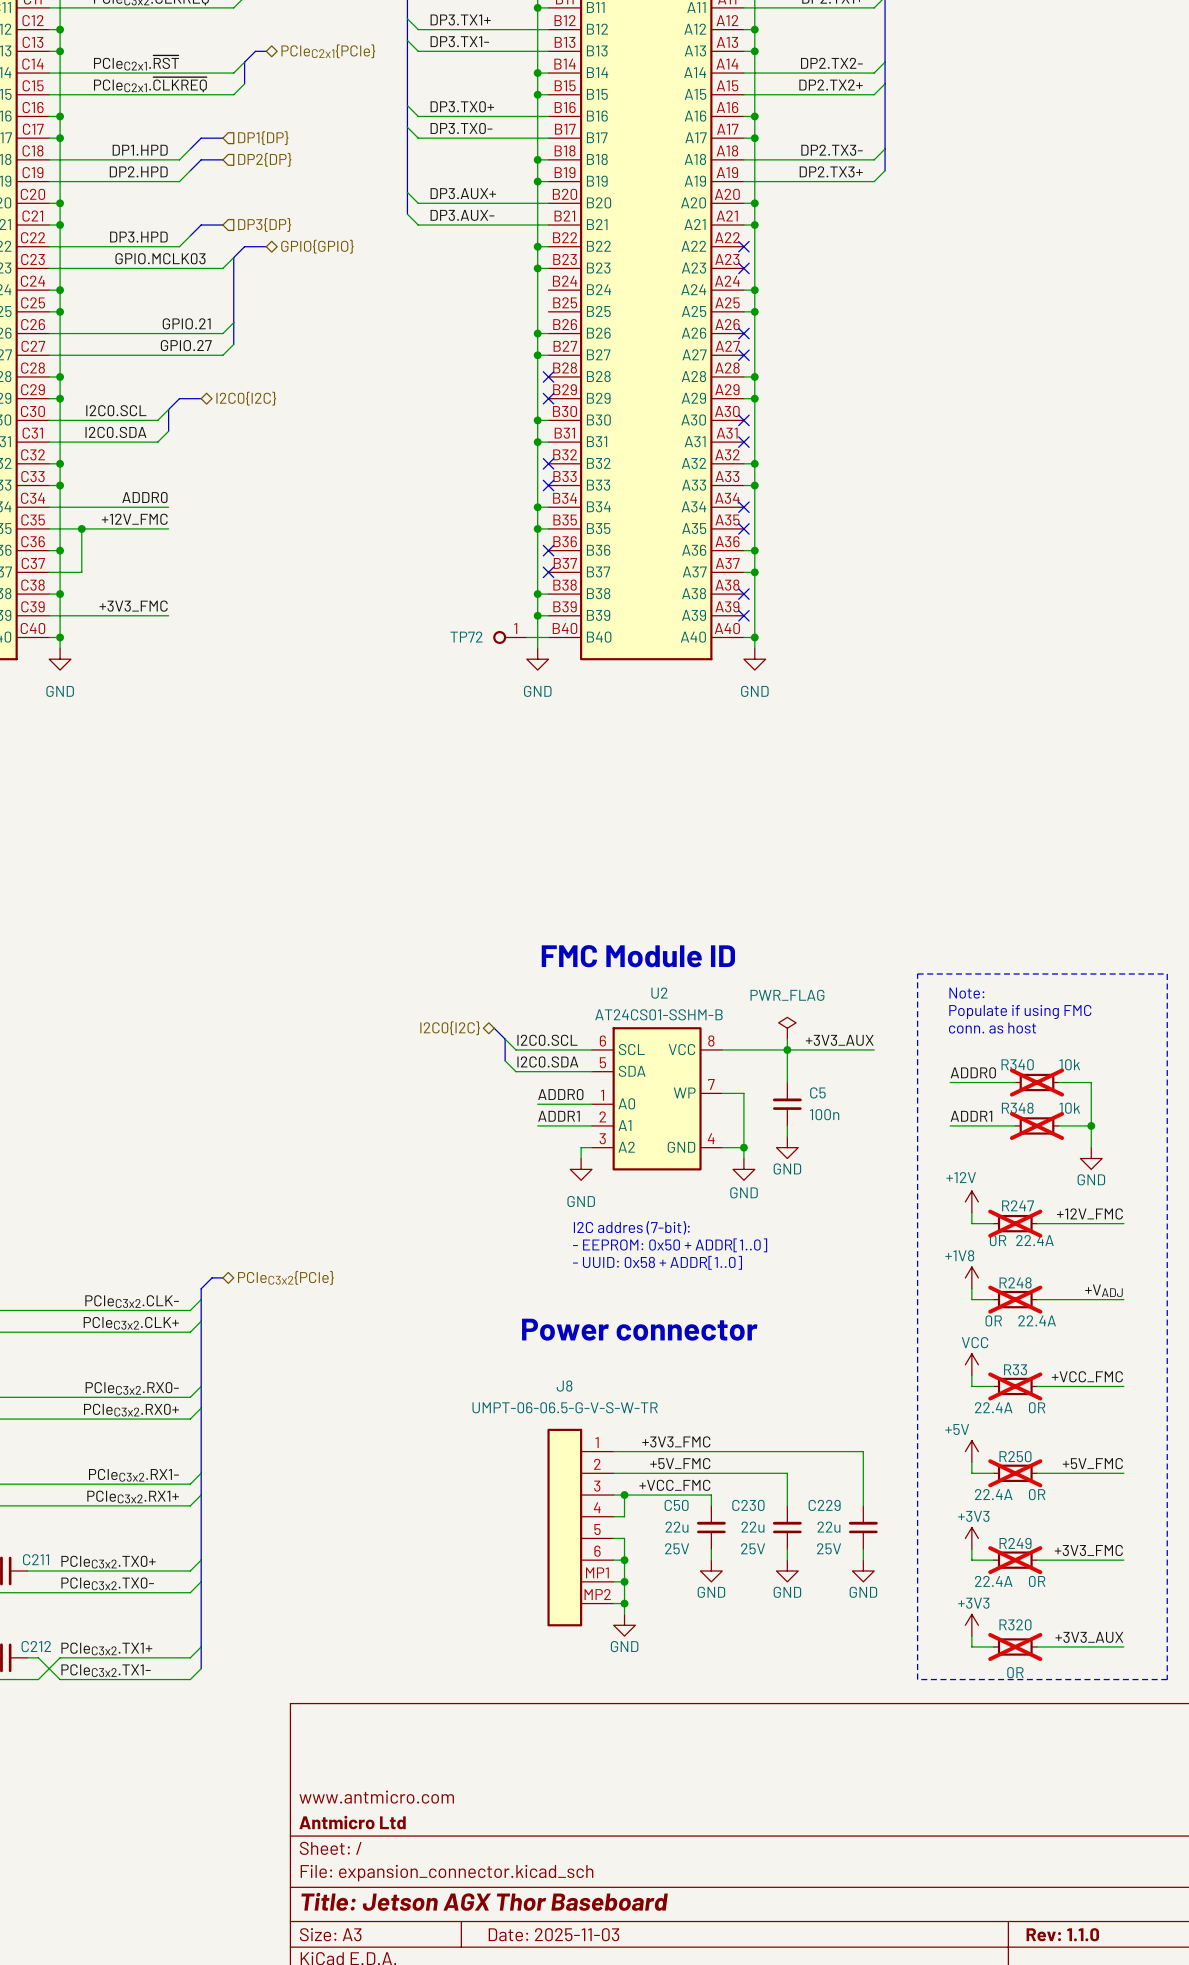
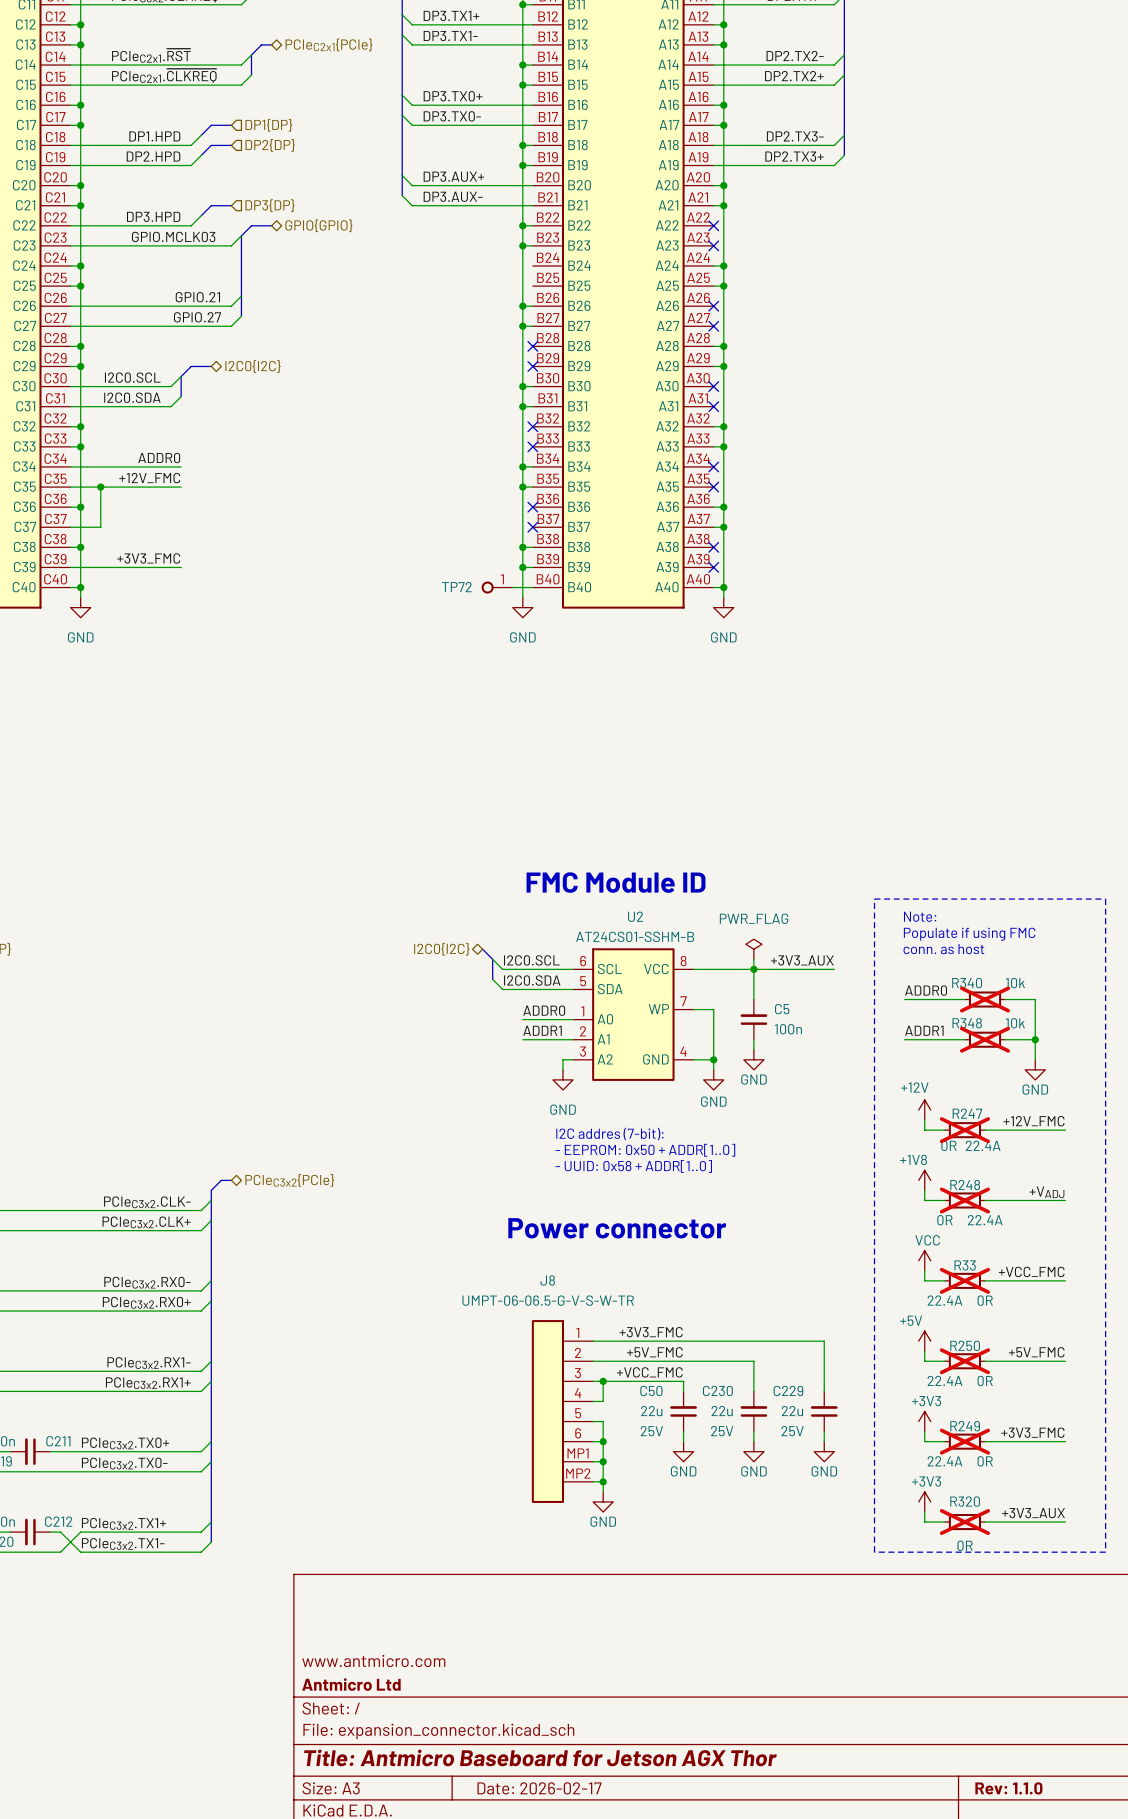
title block: Title: Jetson AGX Thor Baseboard (484, 1901) -> Title: Antmicro Baseboard for Jetson AGX Thor (540, 1757)
title block: Date: 2025-11-03 (553, 1934) -> Date: 2026-02-17 (539, 1788)

